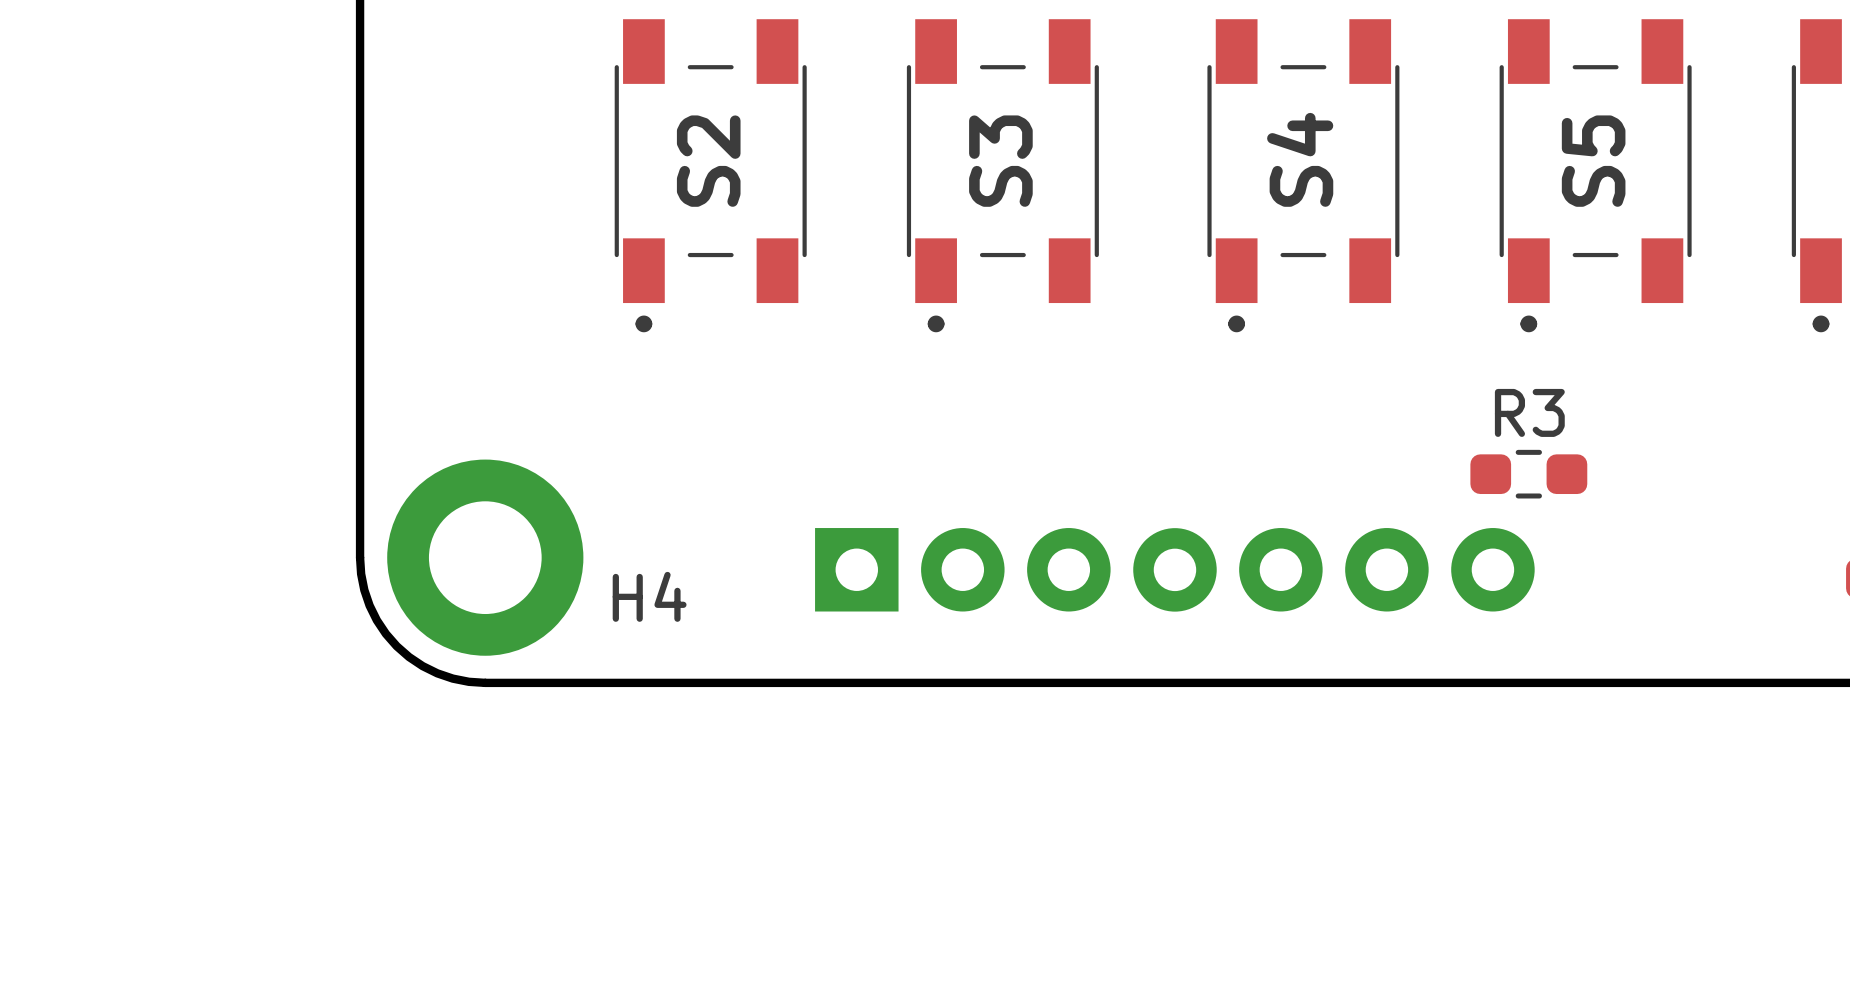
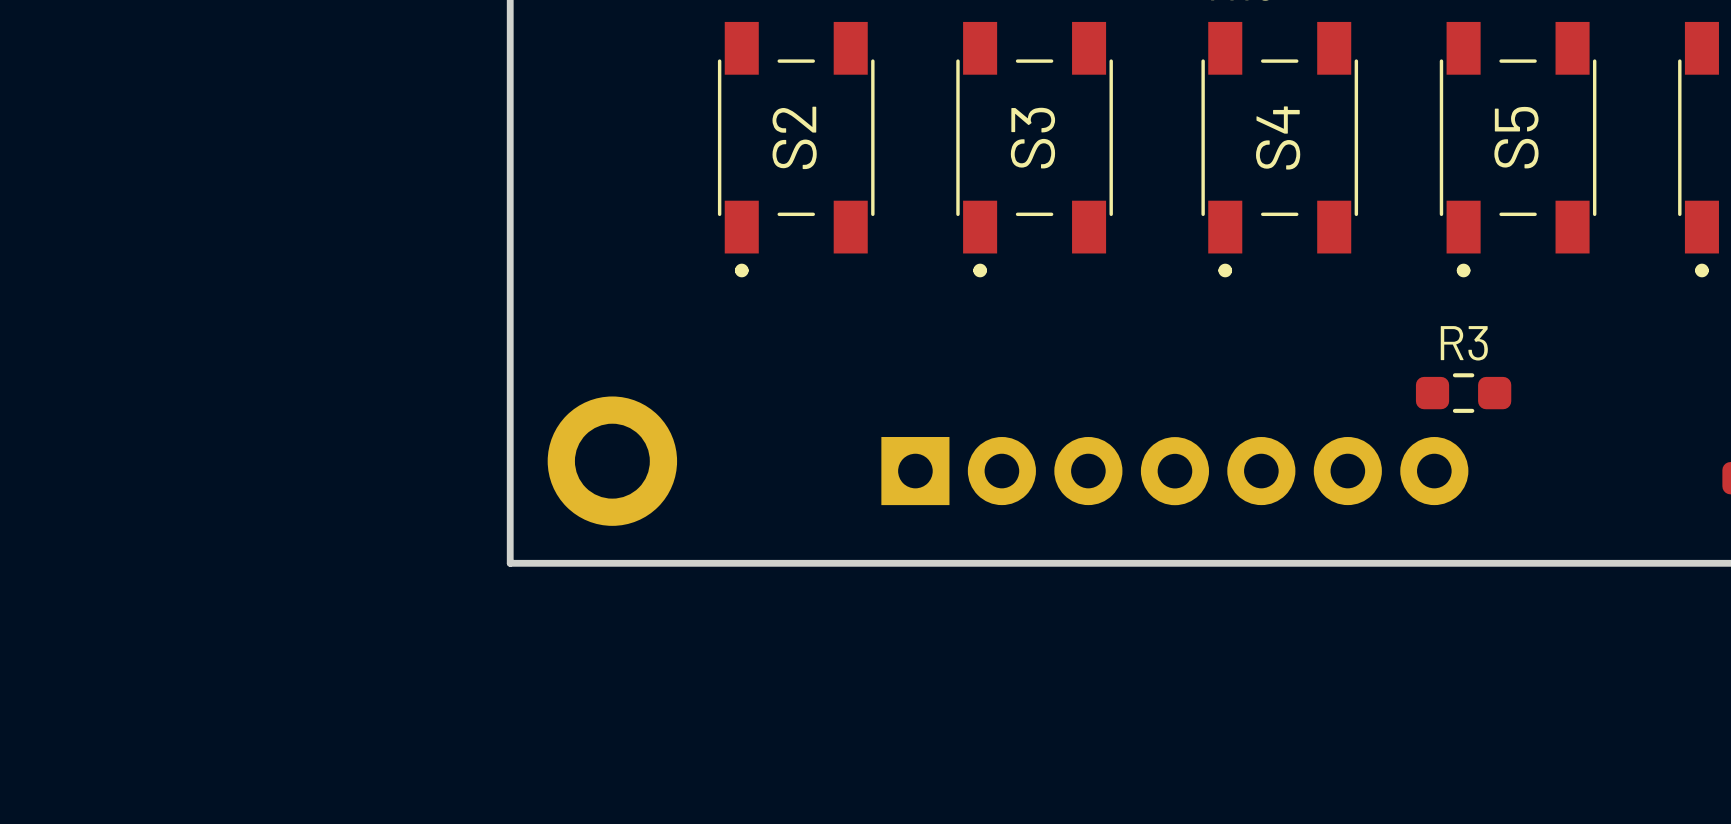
board edge: (360, 557) (361, 574) (369, 605) (376, 620) (396, 646) (409, 657) (437, 673) (452, 678) (485, 682) -> (510, 461) (510, 563) (612, 563)
H4: (485, 557) -> none
part: none -> (612, 461)

